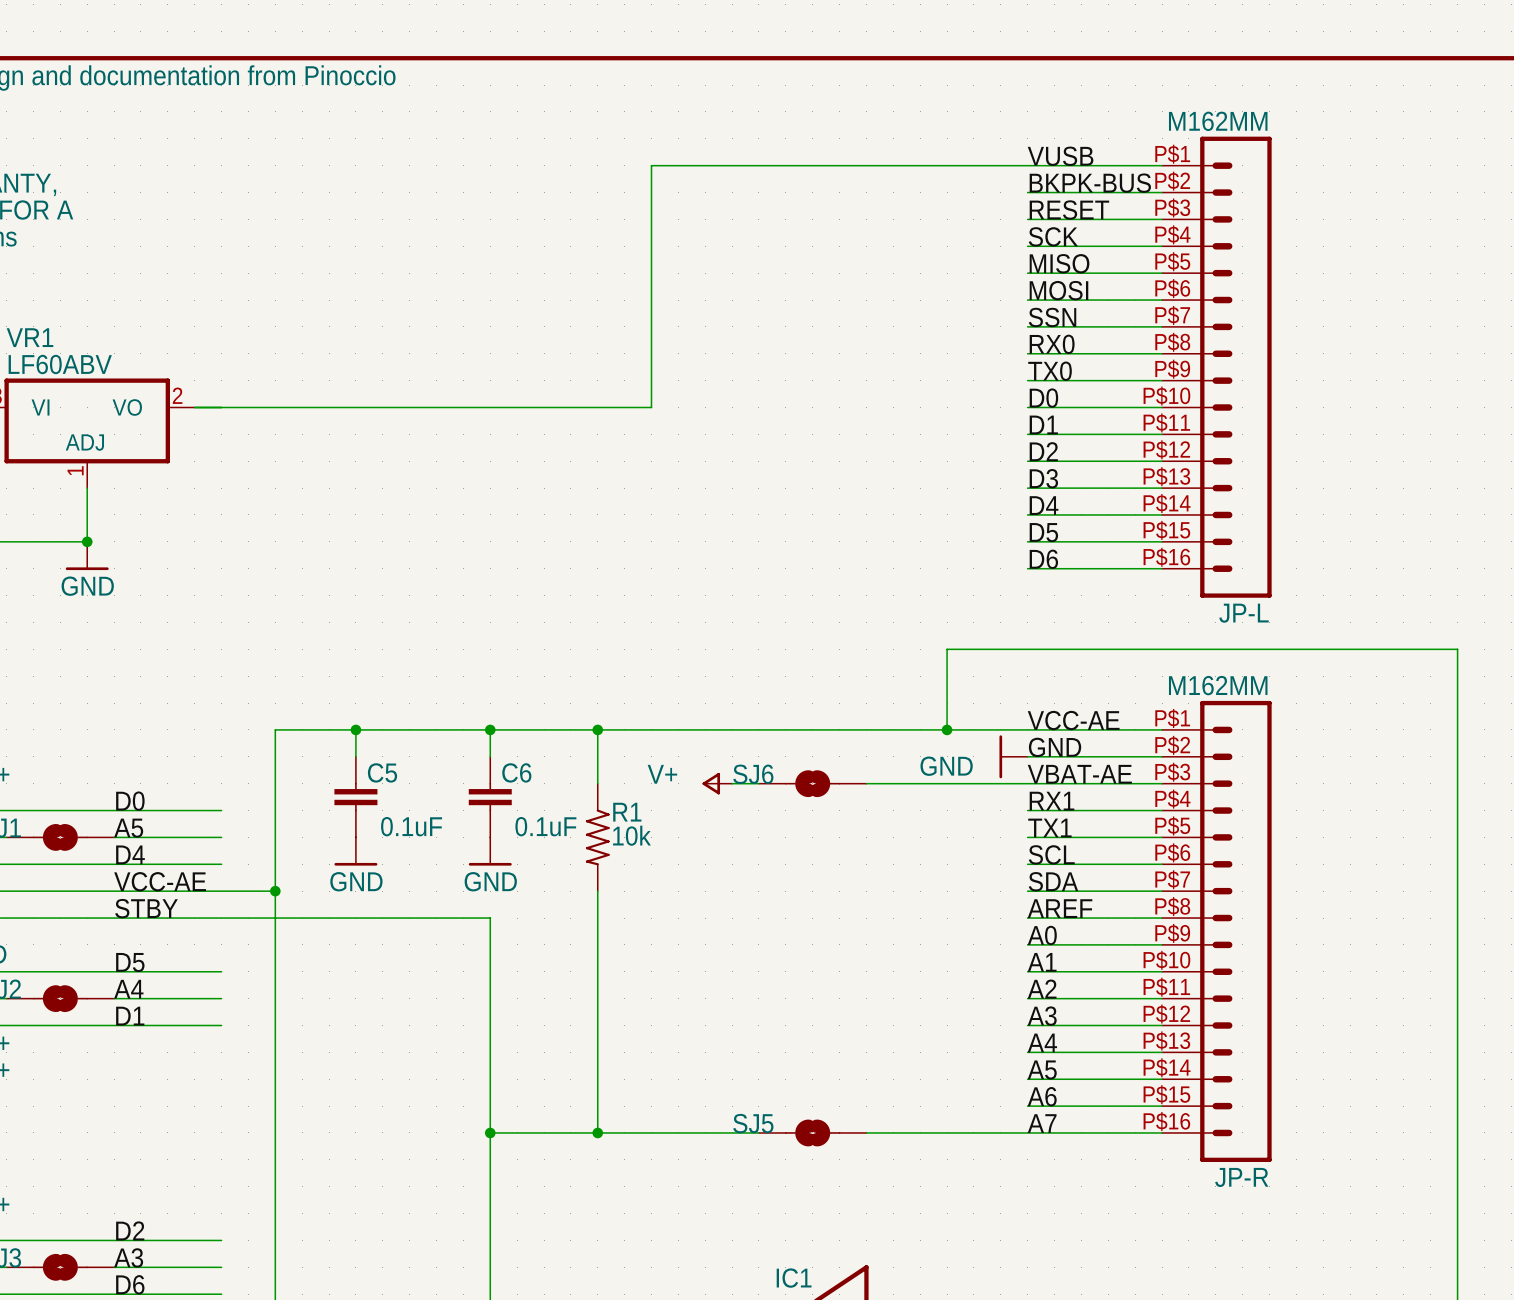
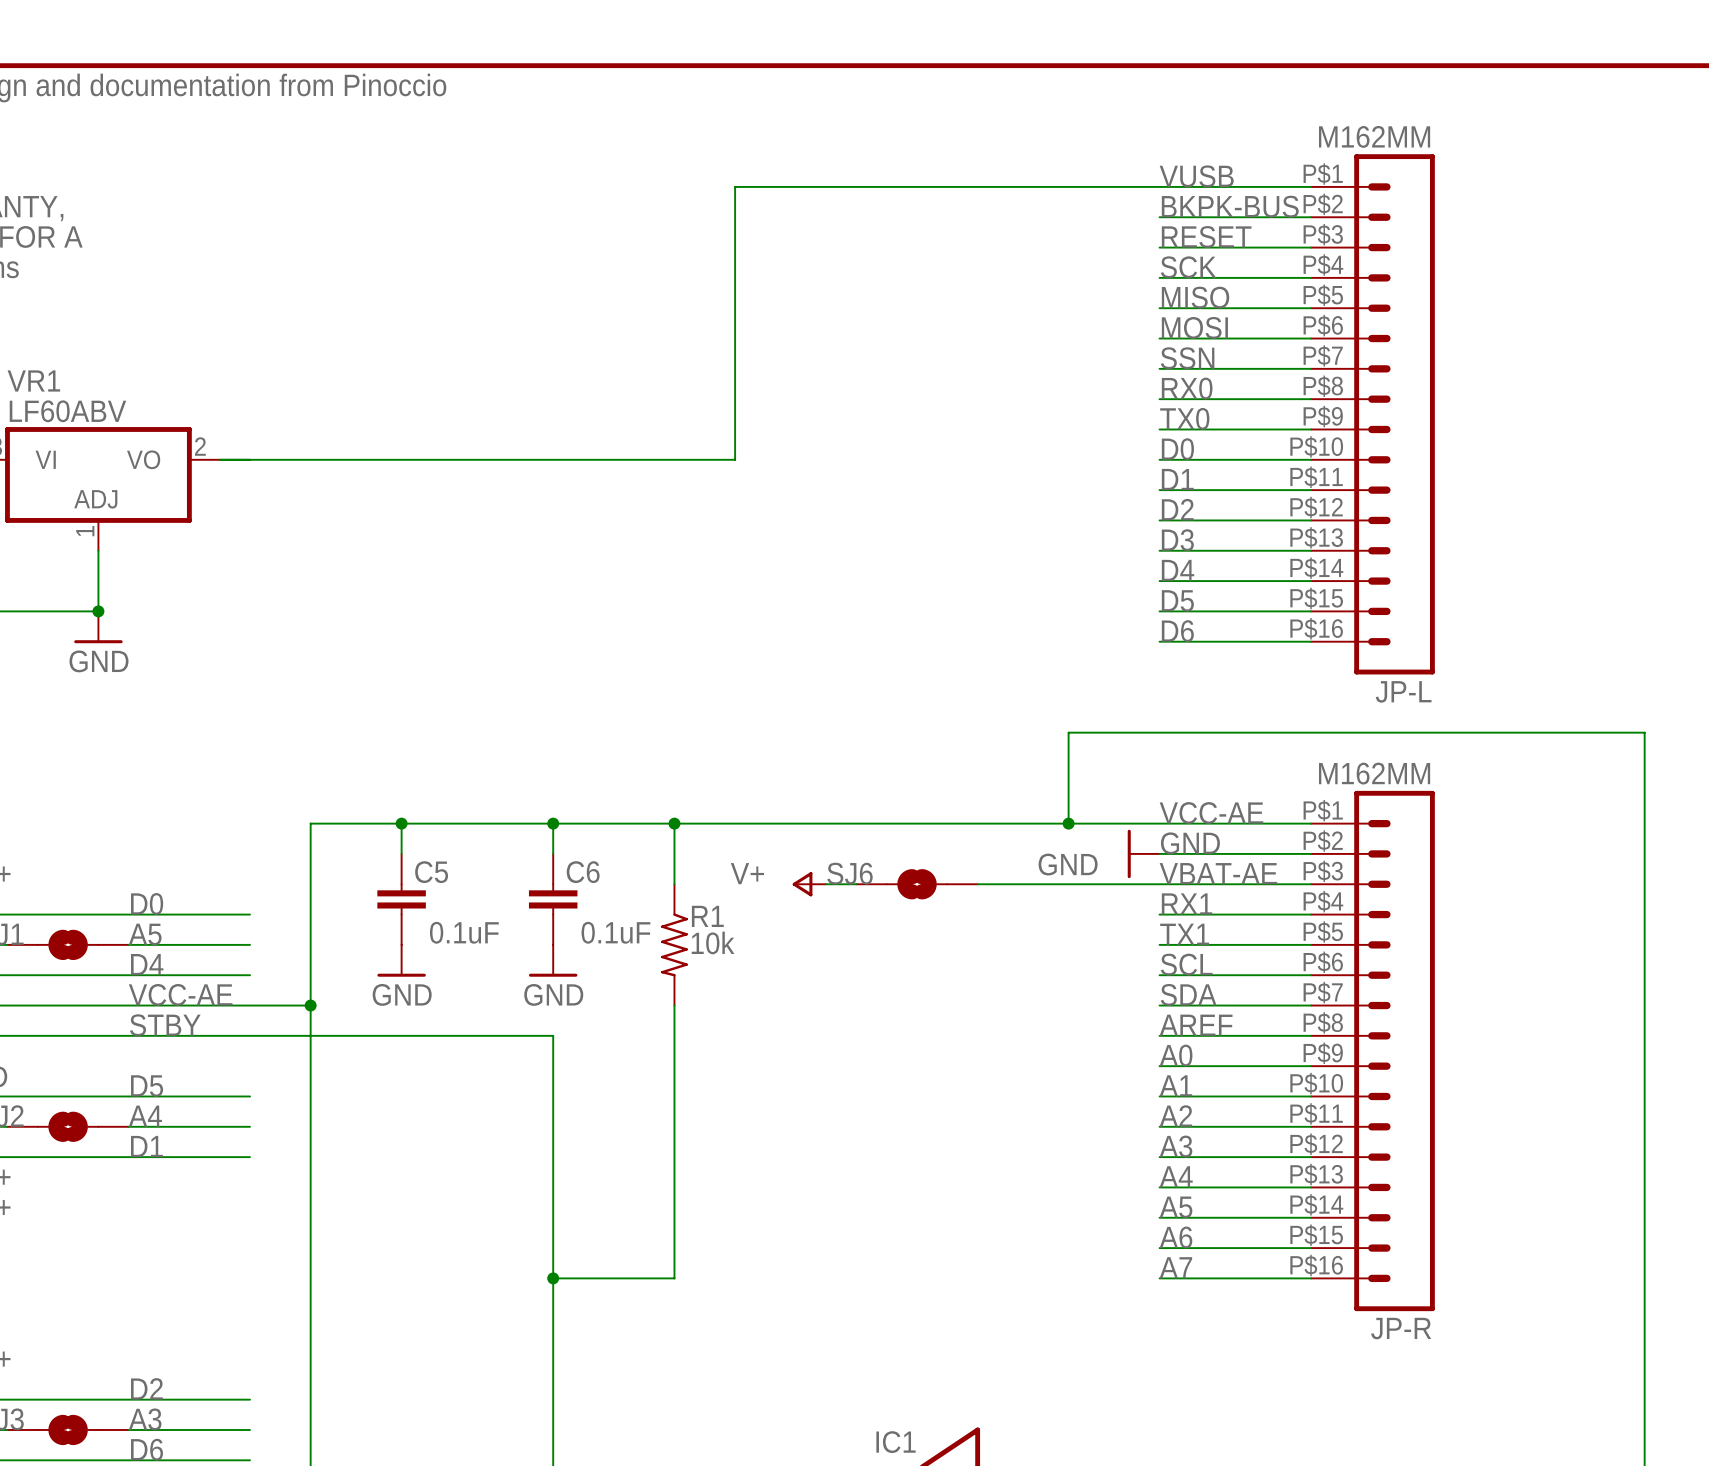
wire: (597, 1132) (758, 1132) -> none
junction: (597, 1132) -> none
SJ5: (812, 1132) -> none
wire: (866, 1132) (1027, 1132) -> none

